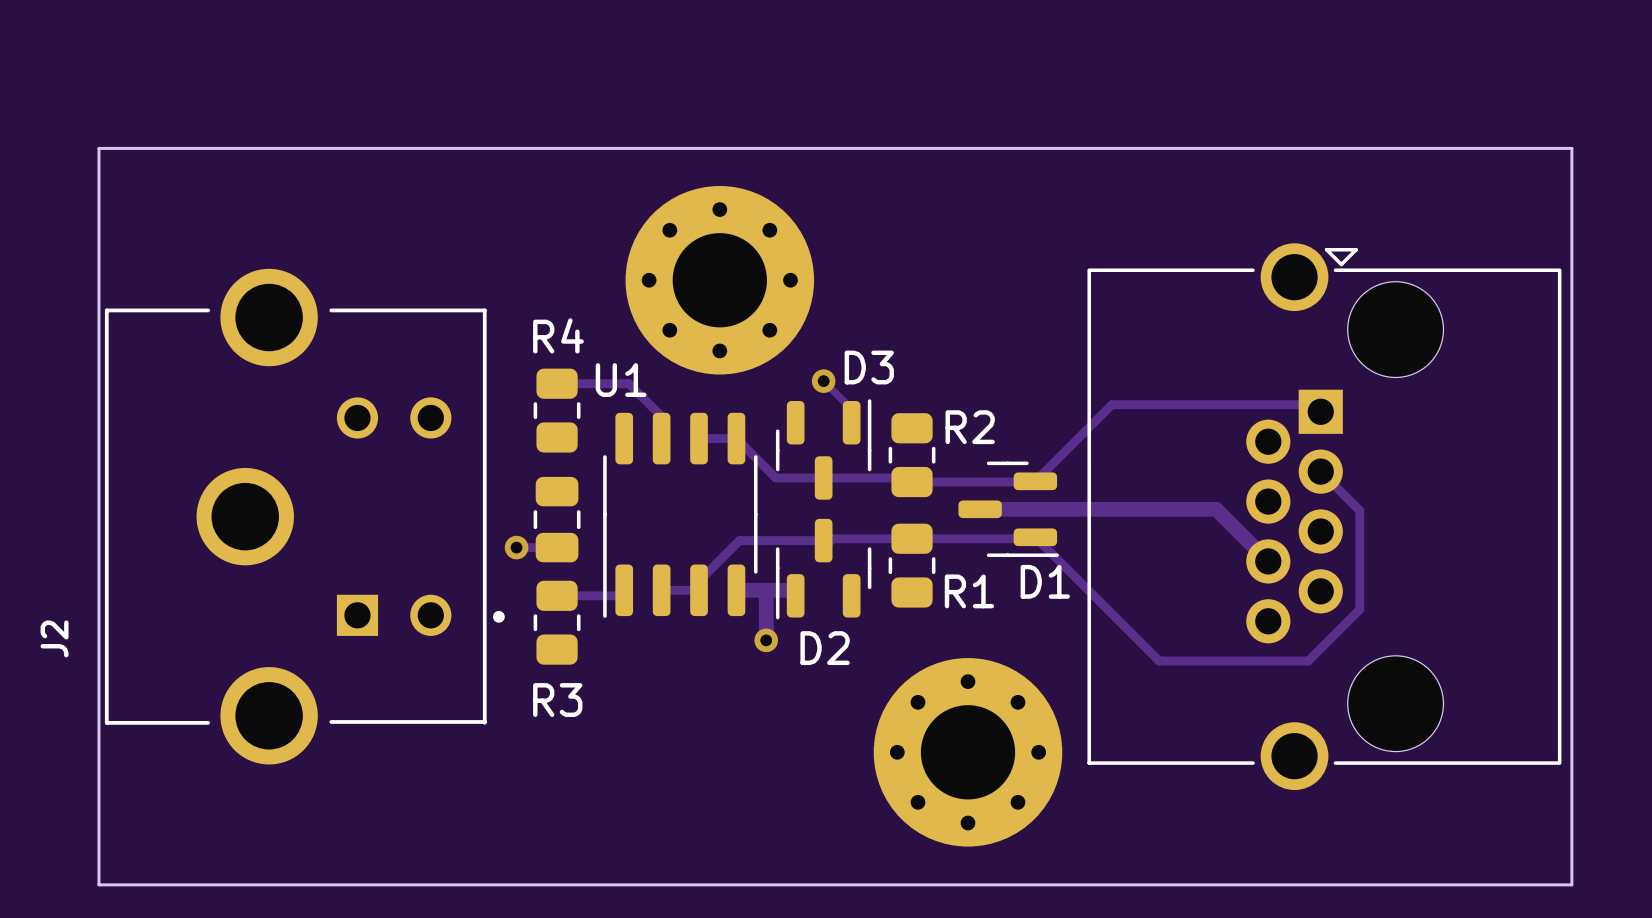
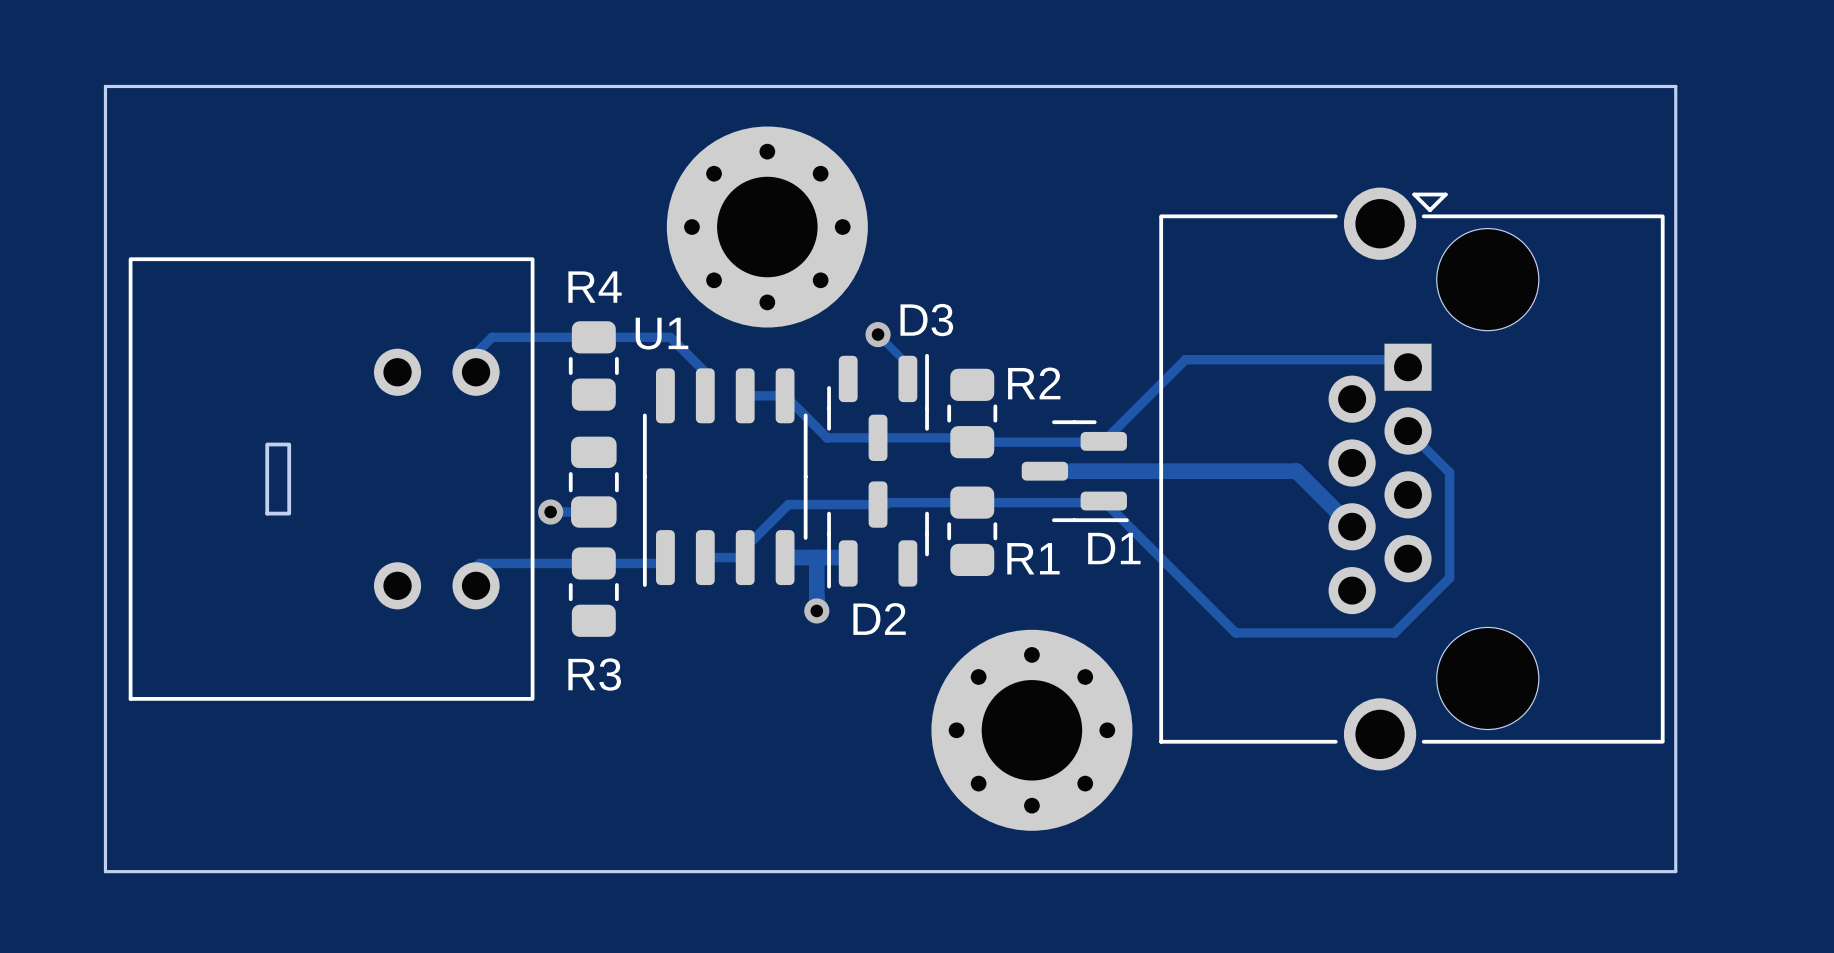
track: none -> (593, 337) (492, 337) (460, 369)
J2: (304, 516) -> none
part: none -> (331, 479)
track: none -> (593, 563) (479, 563) (460, 582)

